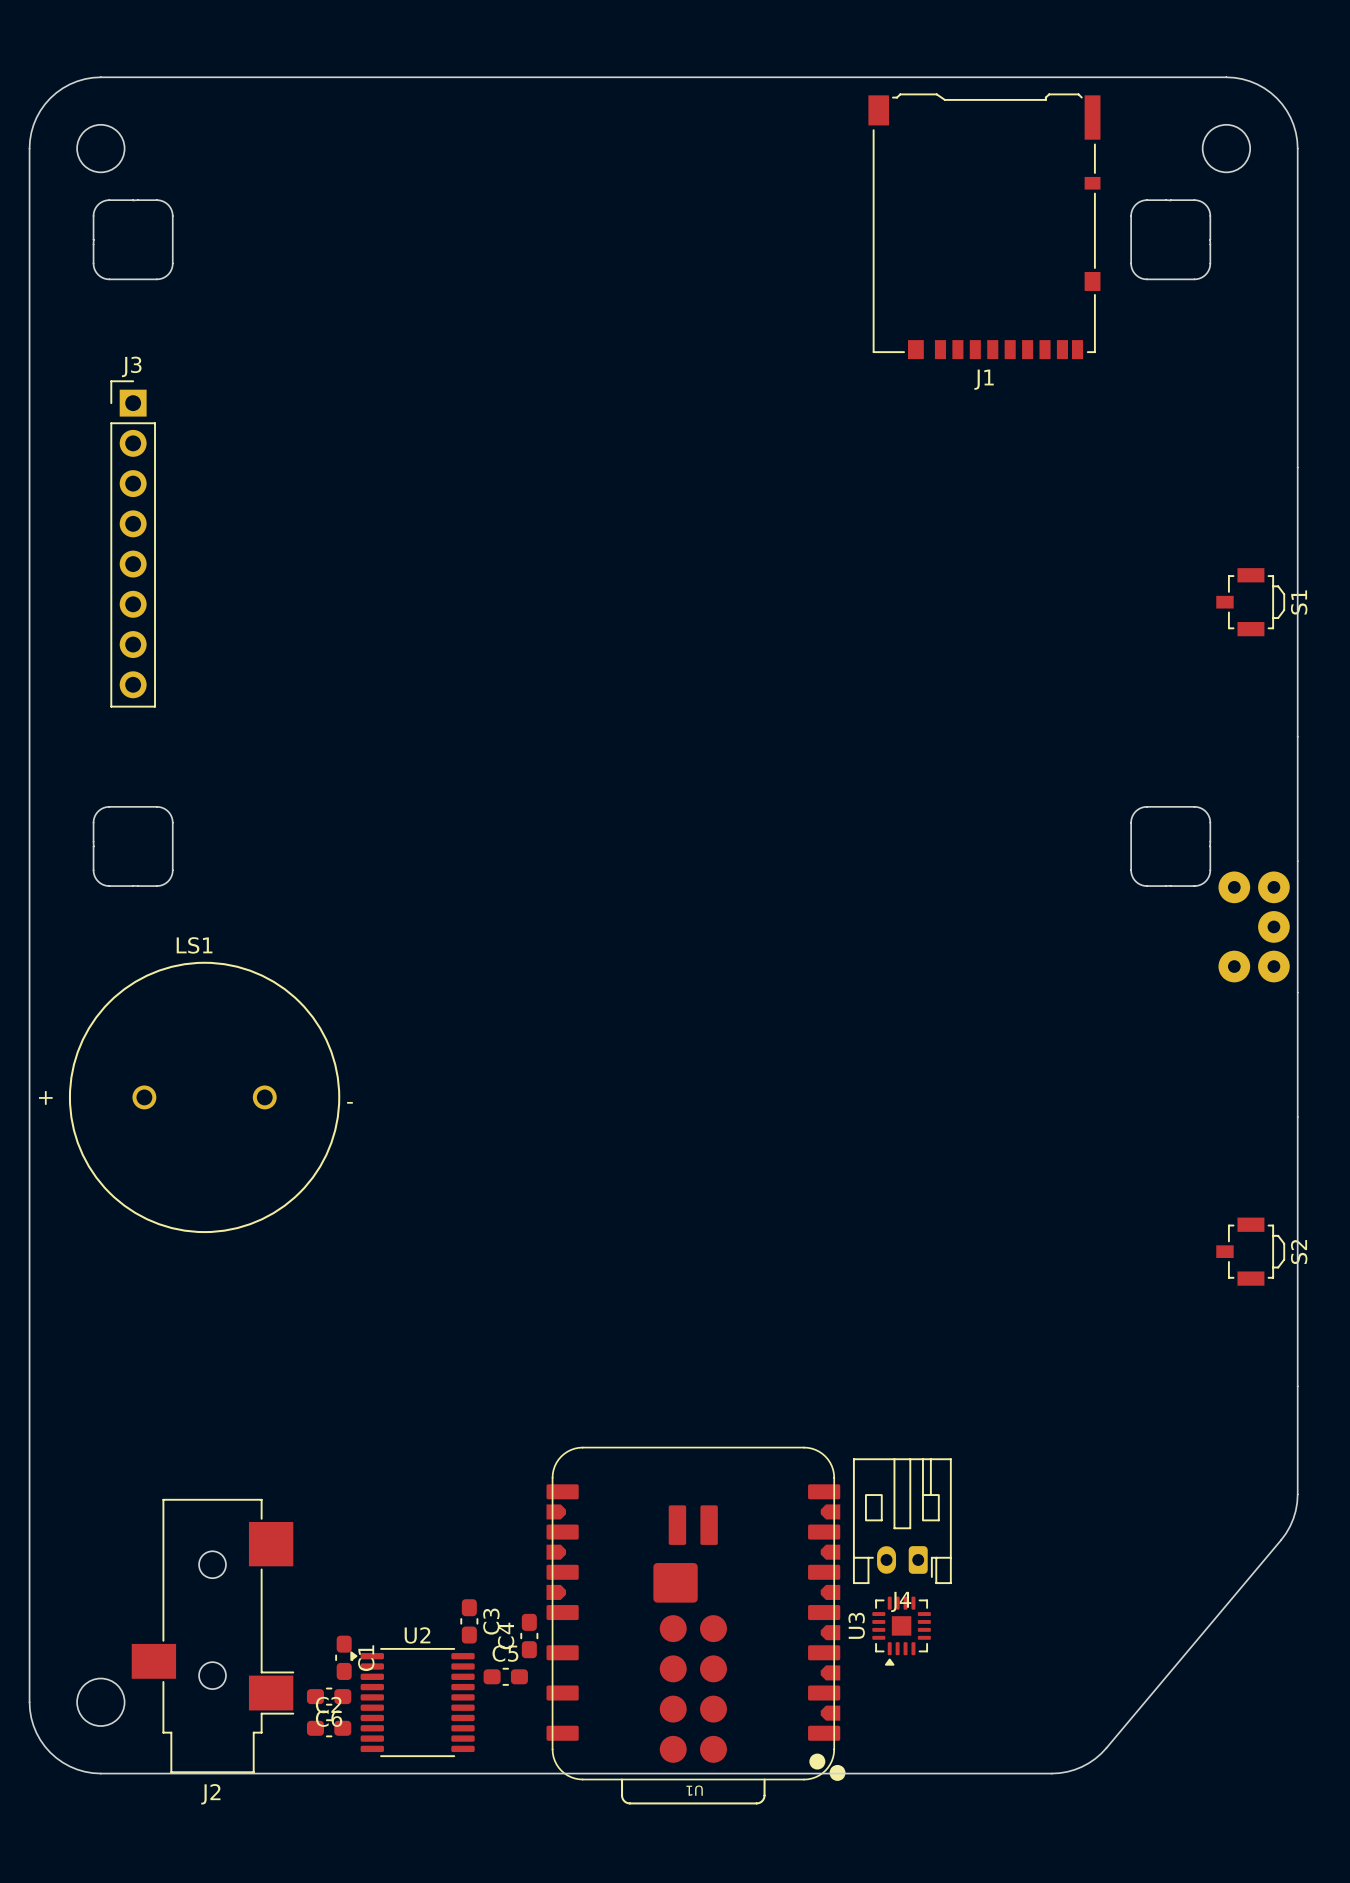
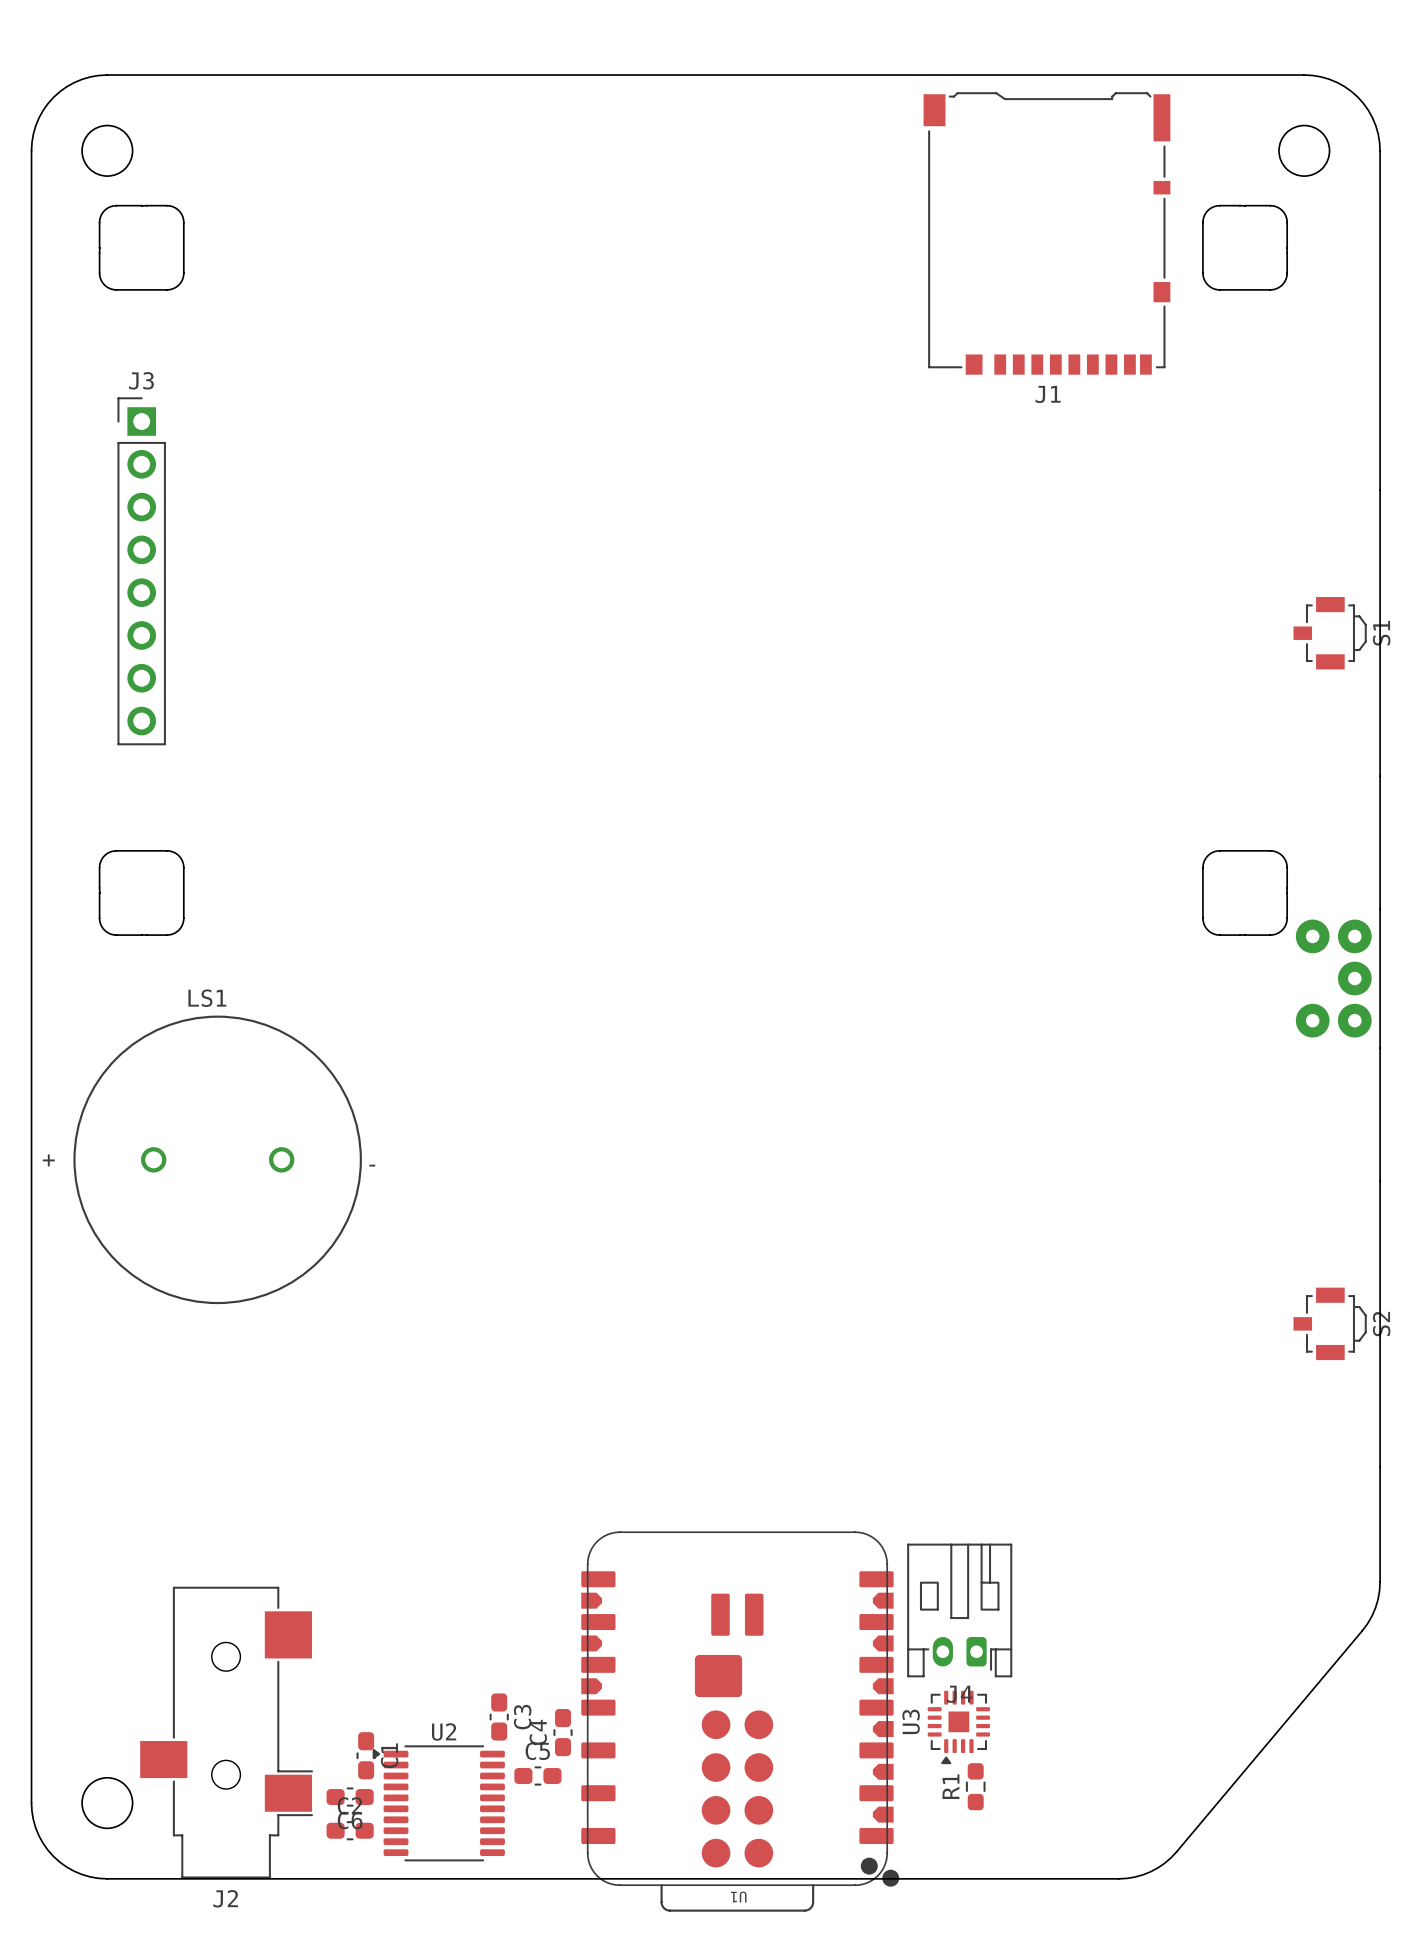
R1: none -> (975, 1786)

